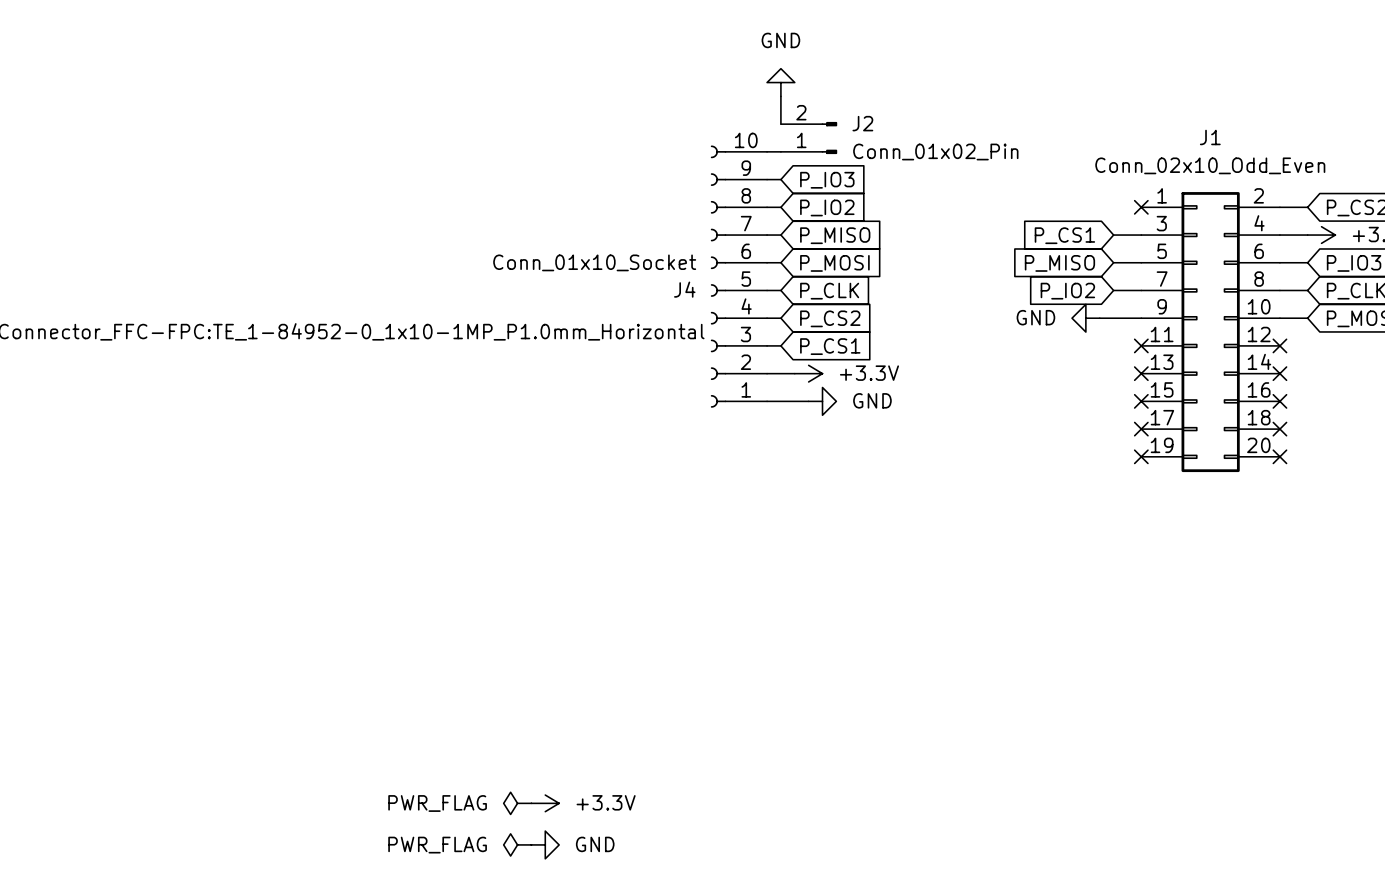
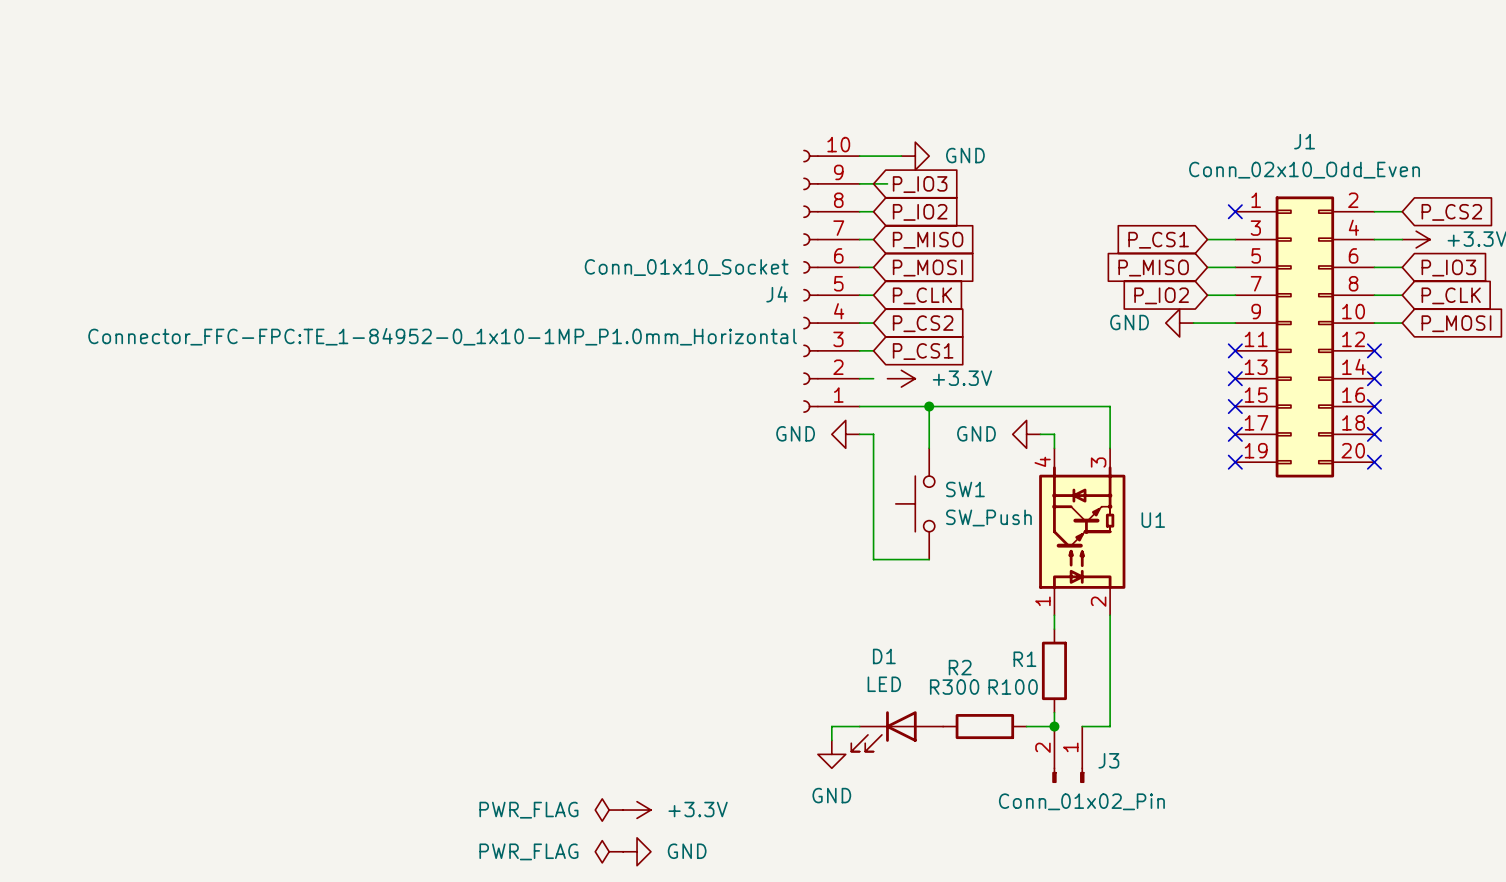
power symbol rotation: 0° (780, 82) -> 90° clockwise (915, 156)
power symbol position: GND (780, 82) -> GND (915, 156)
wire: (780, 96) (780, 124) -> none
J2: Conn_01x02_Pin (809, 138) -> none
wire: (780, 373) (794, 373) -> (873, 183) (887, 183)
wire: none -> (901, 406) (1110, 406) (1110, 448)
power symbol: GND (822, 401) -> none
wire: none -> (929, 406) (929, 448)
junction: none -> (929, 406)
power symbol: none -> GND (845, 434)
wire: none -> (859, 434) (873, 434) (873, 559) (929, 559)
power symbol: none -> GND (1026, 434)
wire: none -> (1040, 434) (1054, 434) (1054, 448)
SW1: none -> SW_Push (915, 503)
U1: none -> (1082, 531)
wire: none -> (1054, 615) (1054, 629)
wire: none -> (1110, 615) (1110, 726) (1082, 726)
R1: none -> R100 (1054, 670)
wire: none -> (1054, 712) (1054, 726) (1026, 726)
wire: none -> (859, 726) (831, 726) (831, 740)
R2: none -> R300 (984, 726)
junction: none -> (1054, 726)
D1: none -> LED (897, 731)
power symbol: none -> GND (831, 754)
J3: none -> Conn_01x02_Pin (1068, 754)

